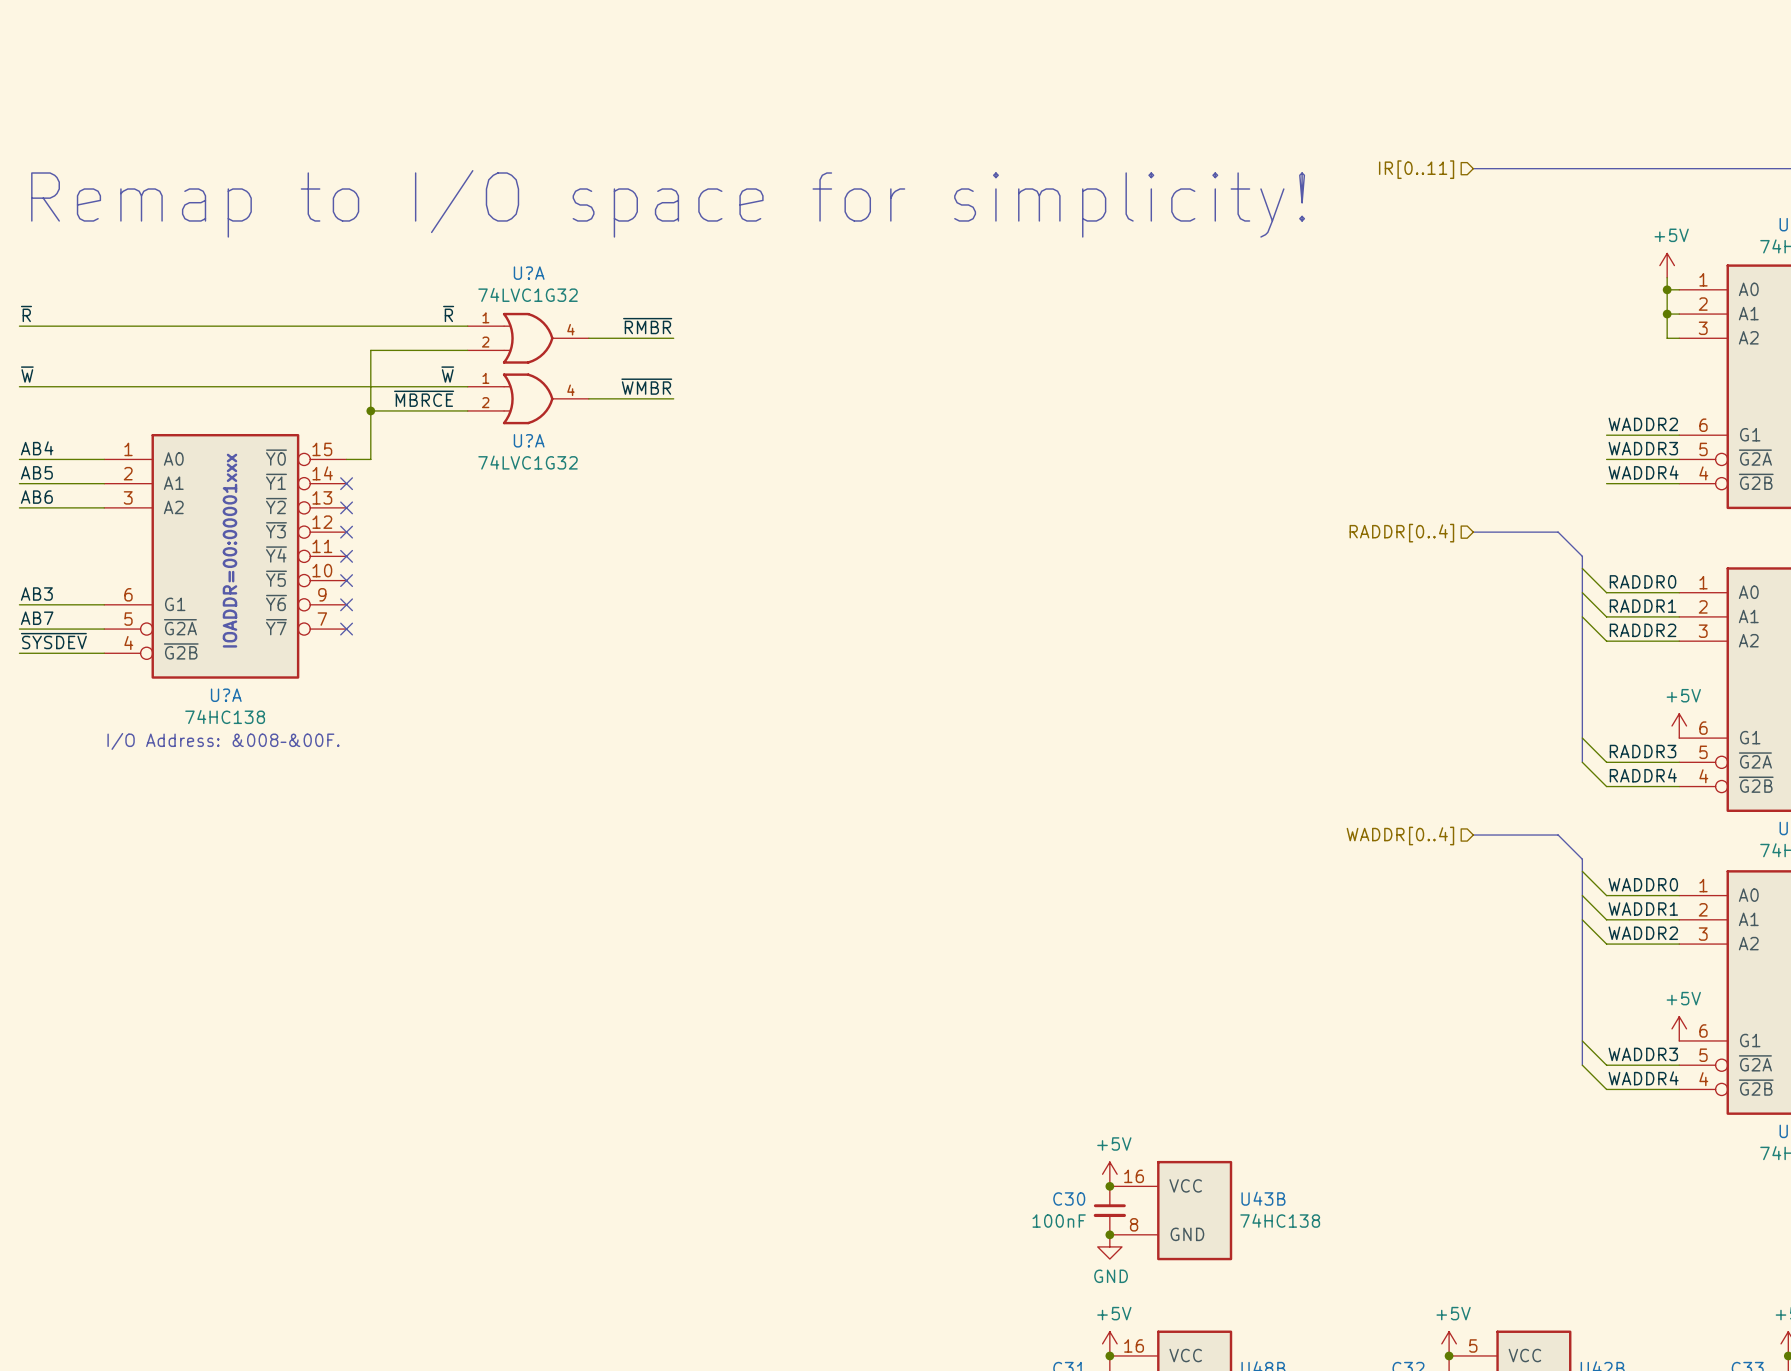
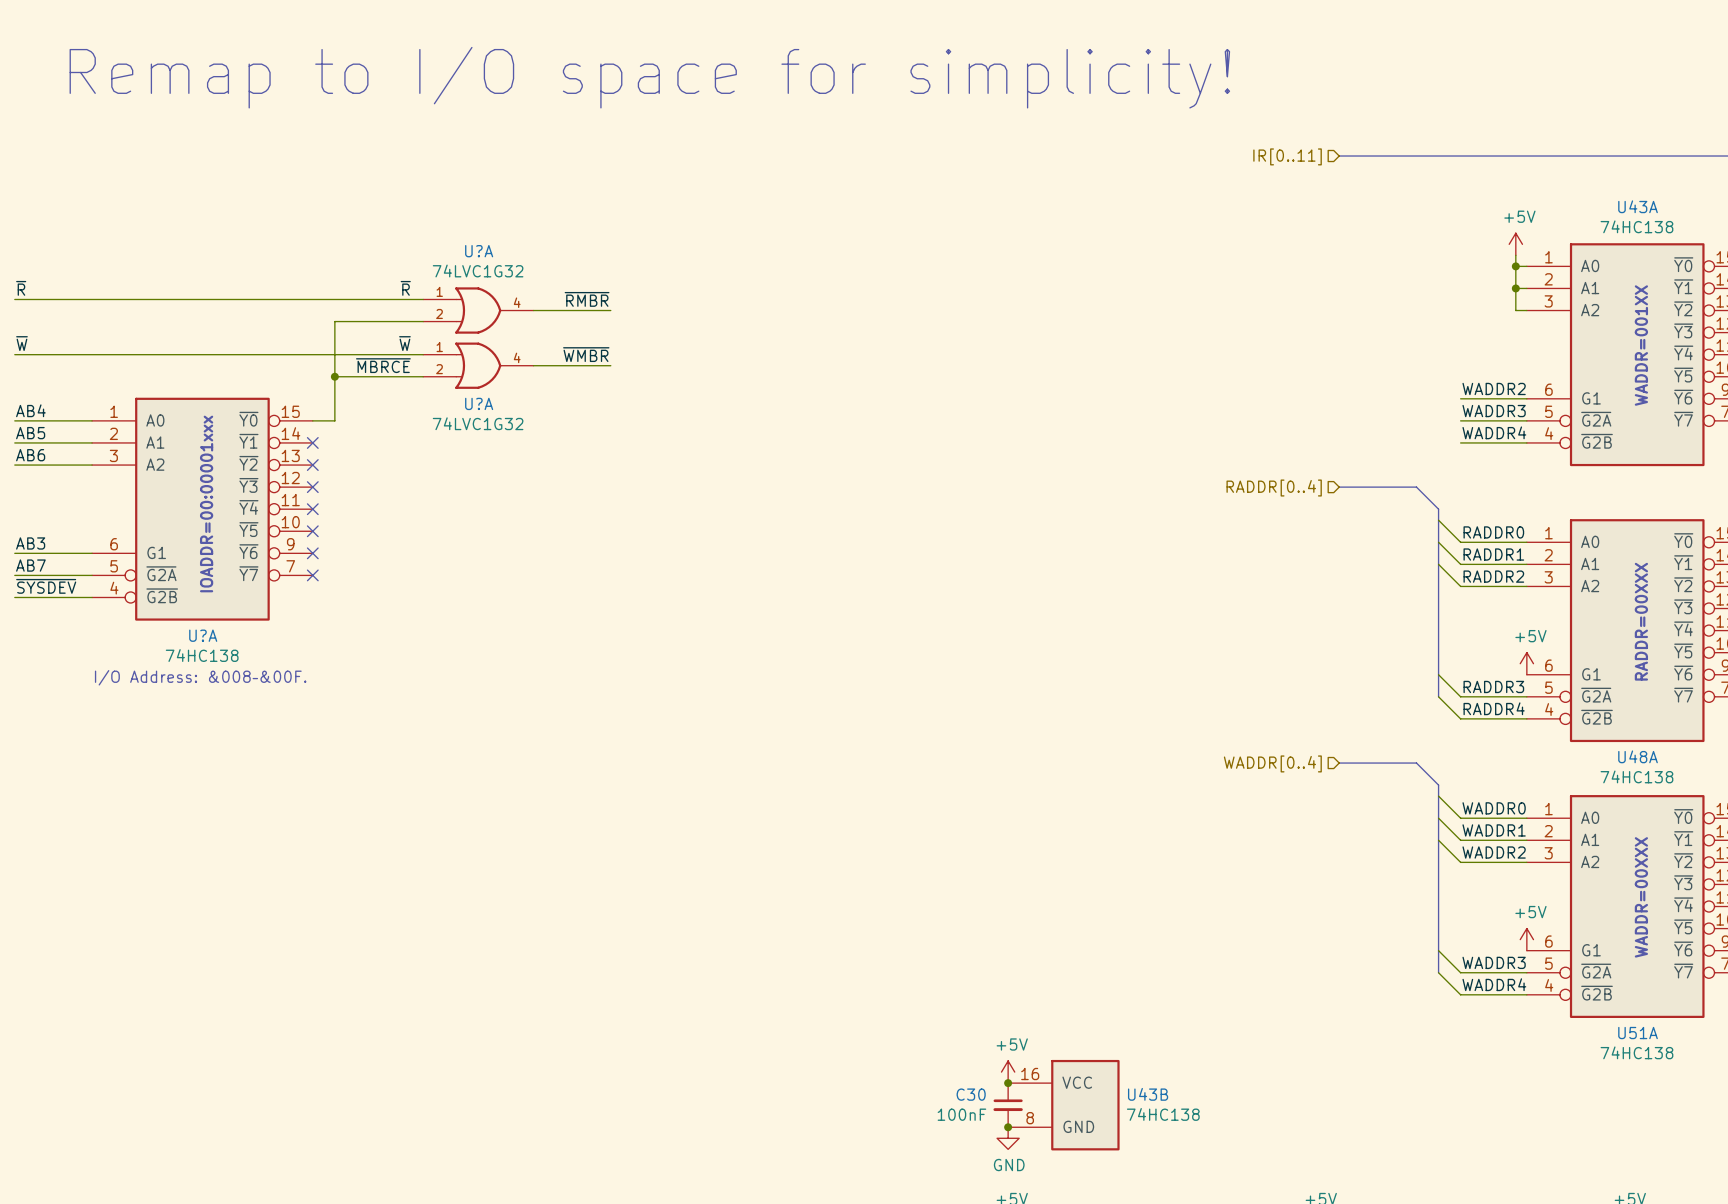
text position: Remap to I/O space for simplicity! (668, 203) -> Remap to I/O space for simplicity! (649, 77)

